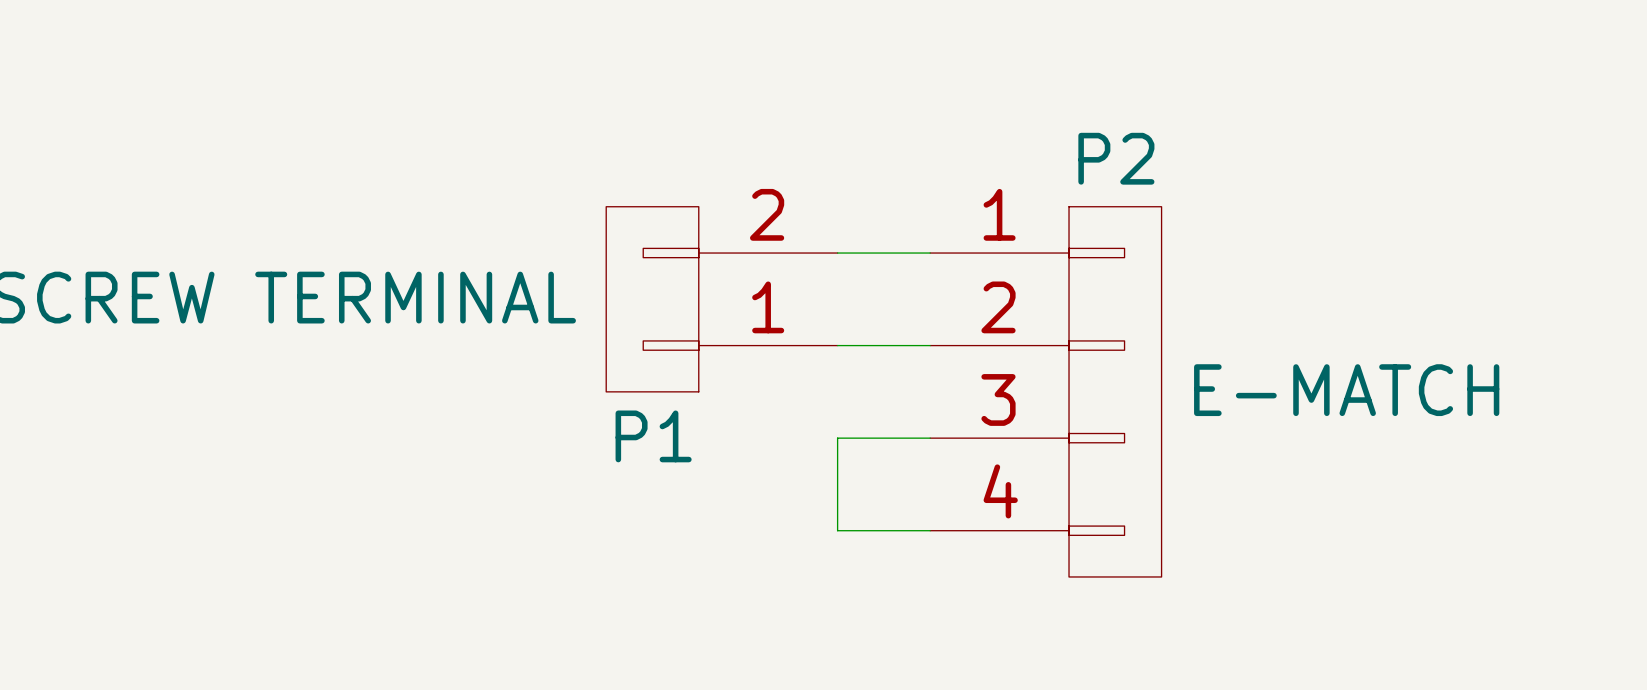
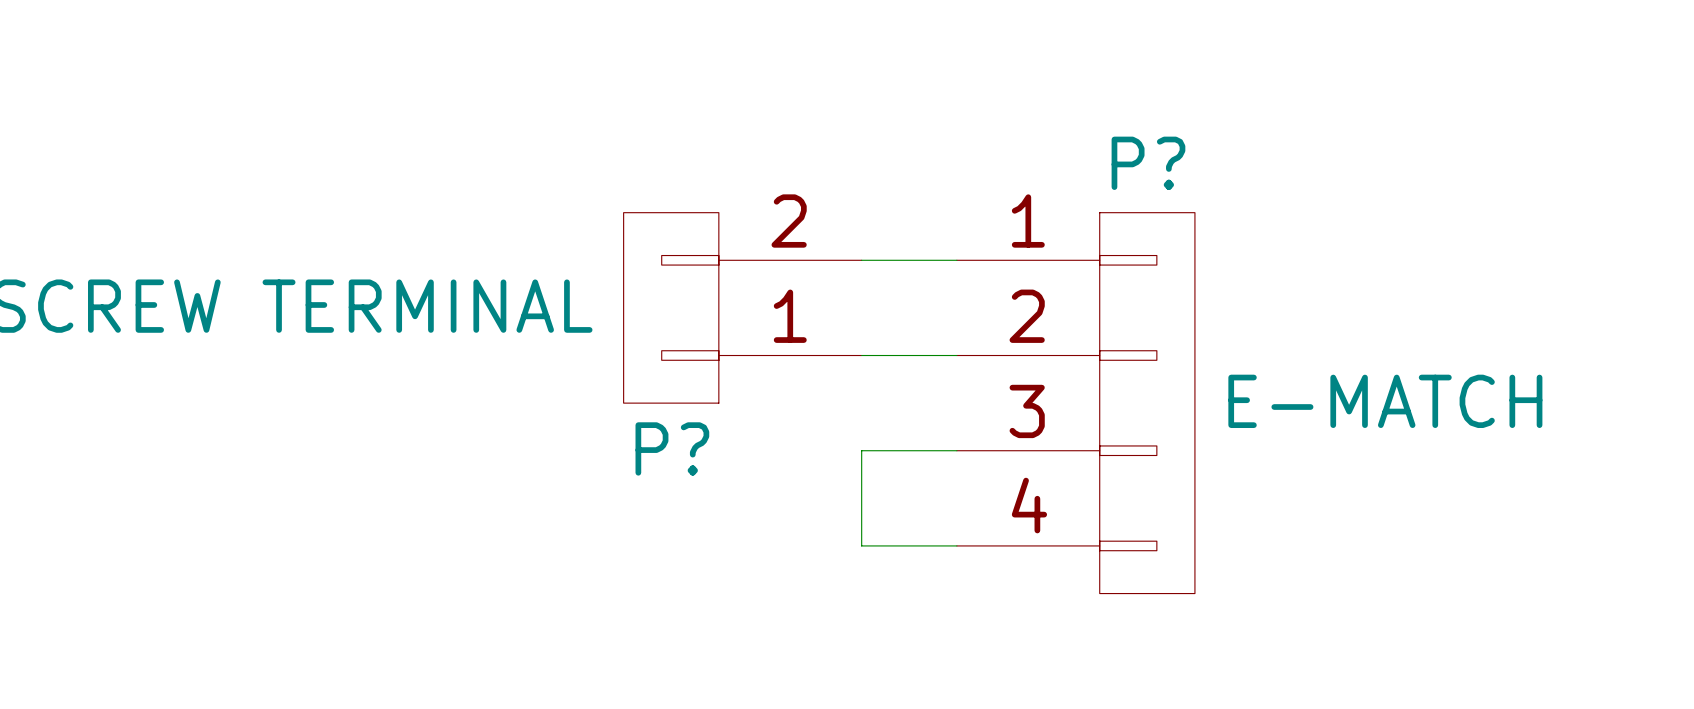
P2 name: P2 (1116, 158) -> P? (1148, 163)
P1 name: P1 (653, 436) -> P? (672, 448)

